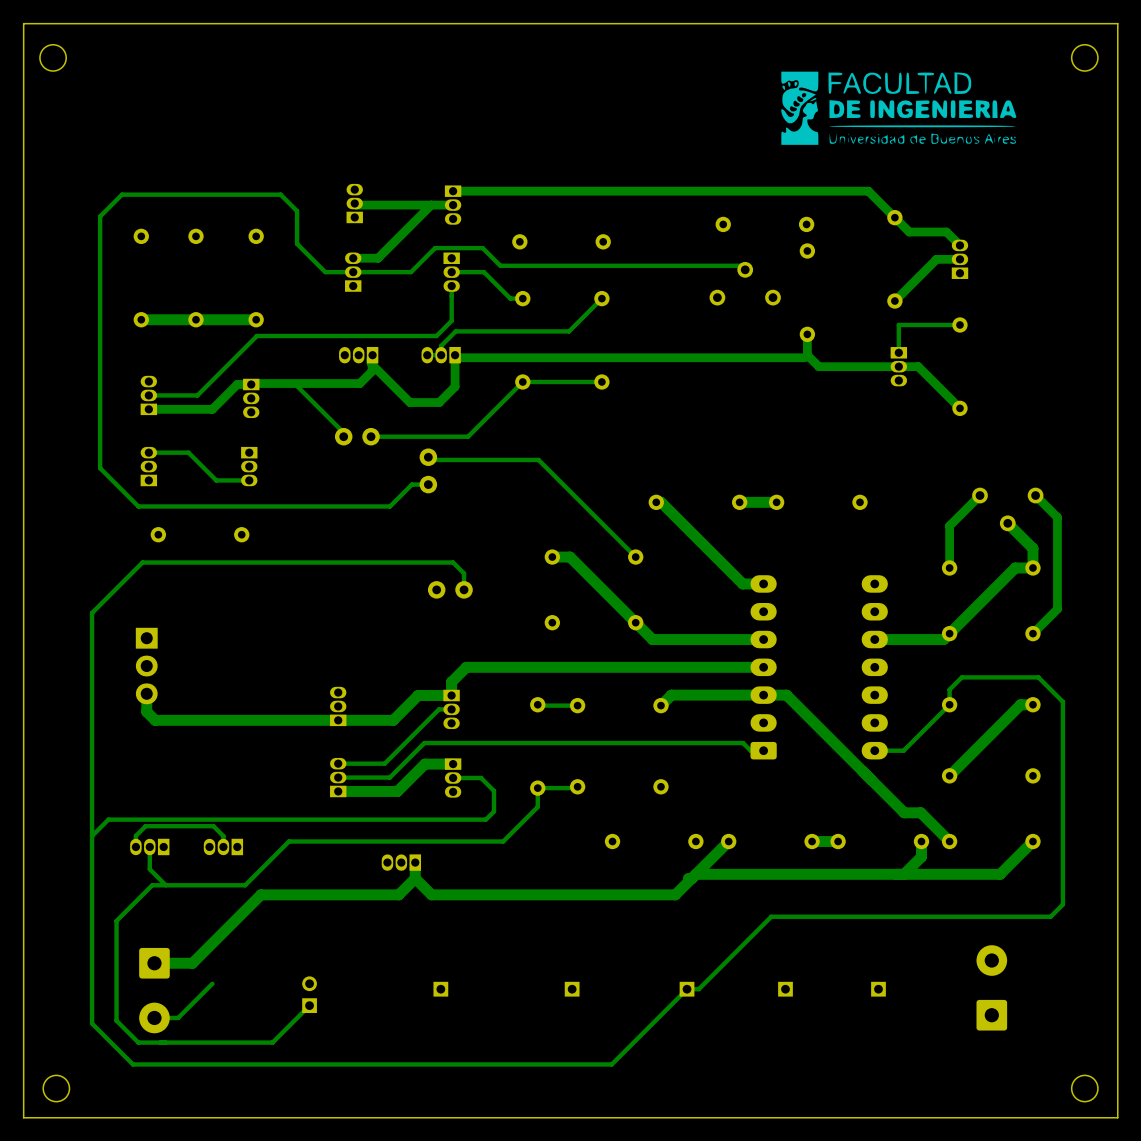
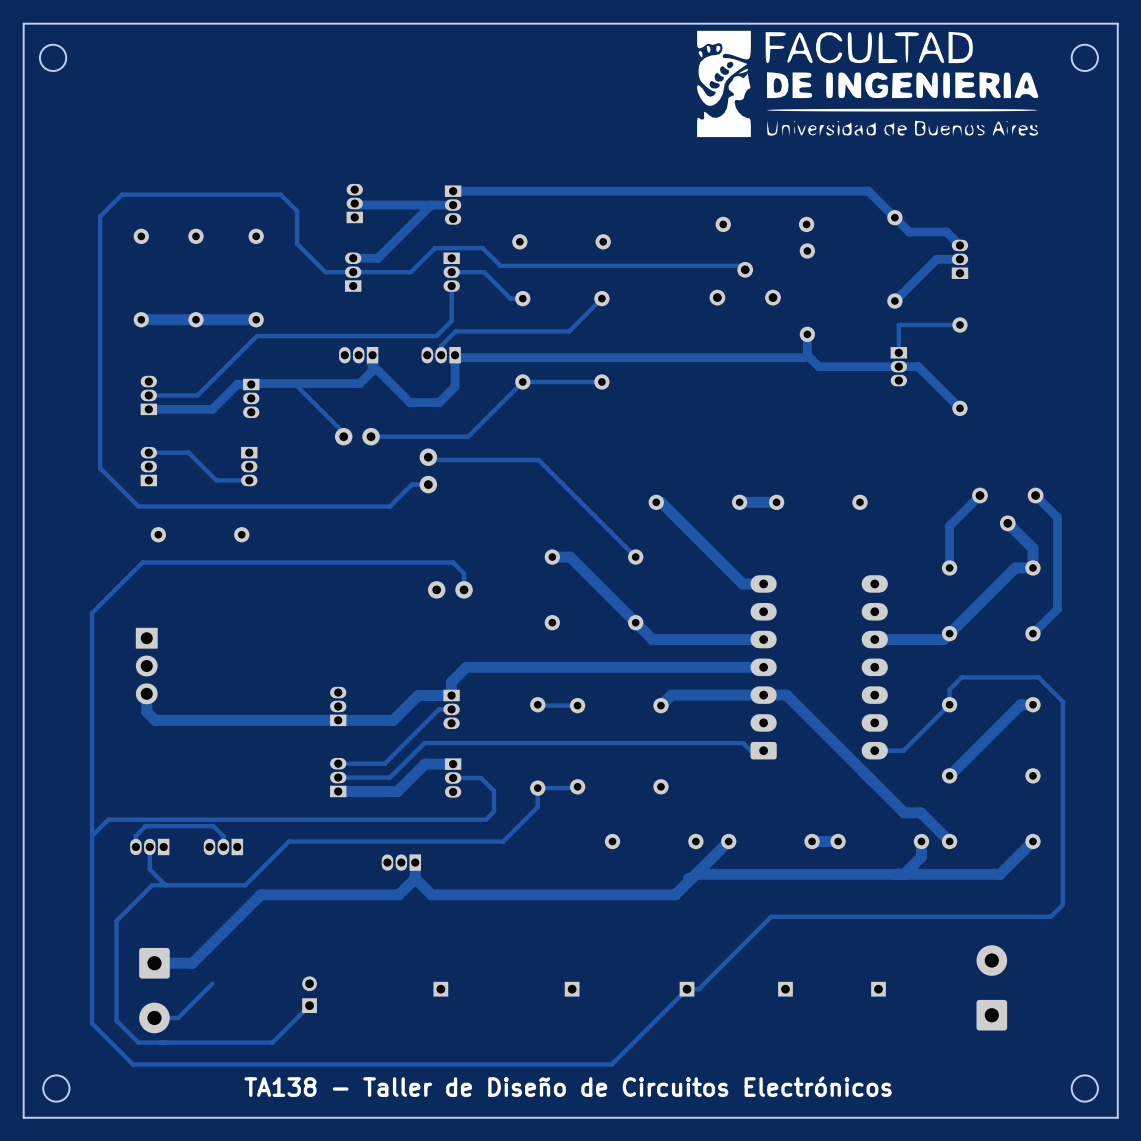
drawing: none -> [697, 30, 1039, 138]
drawing: [781, 71, 1017, 145] -> none
text: none -> TA138 - Taller de Diseño de Circuitos Electrónicos (568, 1086)

